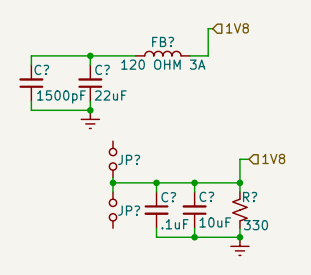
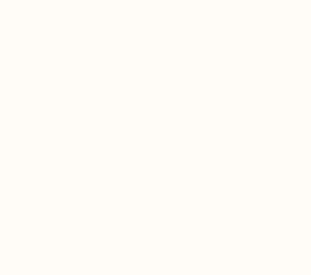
wire: (212, 28) (208, 28) (208, 55) (190, 55) -> none
hierarchical label: 1V8 (237, 28) -> none
FB?: 120 OHM 3A (162, 53) -> none
wire: (90, 55) (90, 64) -> none
junction: (90, 55) -> none
wire: (135, 55) (31, 55) (31, 64) -> none
C?: 1500pF (31, 83) -> none
C?: 22uF (90, 83) -> none
wire: (31, 101) (31, 110) (90, 110) (90, 101) -> none
junction: (90, 110) -> none
power symbol: (90, 119) -> none
hierarchical label: 1V8 (273, 158) -> none
JP?: (112, 159) -> none
wire: (249, 159) (239, 159) (239, 191) -> none
wire: (112, 177) (112, 191) -> none
wire: (112, 182) (239, 182) -> none
junction: (112, 182) -> none
wire: (156, 182) (156, 191) -> none
junction: (156, 182) -> none
wire: (194, 182) (194, 191) -> none
junction: (194, 182) -> none
junction: (239, 182) -> none
JP?: (112, 210) -> none
C?: .1uF (156, 210) -> none
C?: 10uF (194, 210) -> none
R?: 330 (239, 210) -> none
wire: (156, 228) (156, 237) (239, 237) (239, 228) -> none
wire: (194, 228) (194, 237) -> none
junction: (194, 237) -> none
junction: (239, 237) -> none
power symbol: (239, 246) -> none

